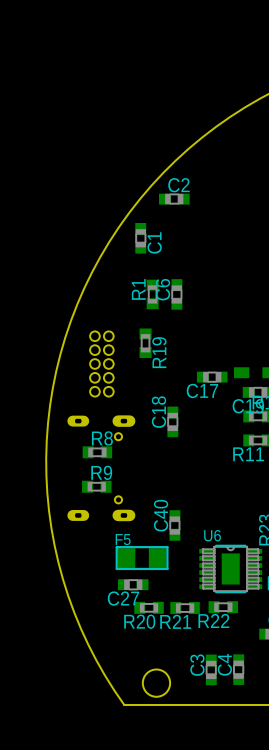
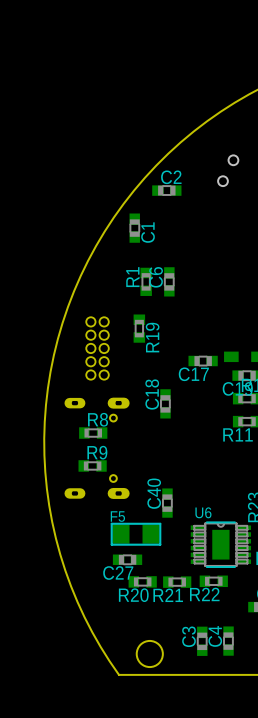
via: none -> (233, 160)
via: none -> (222, 181)

